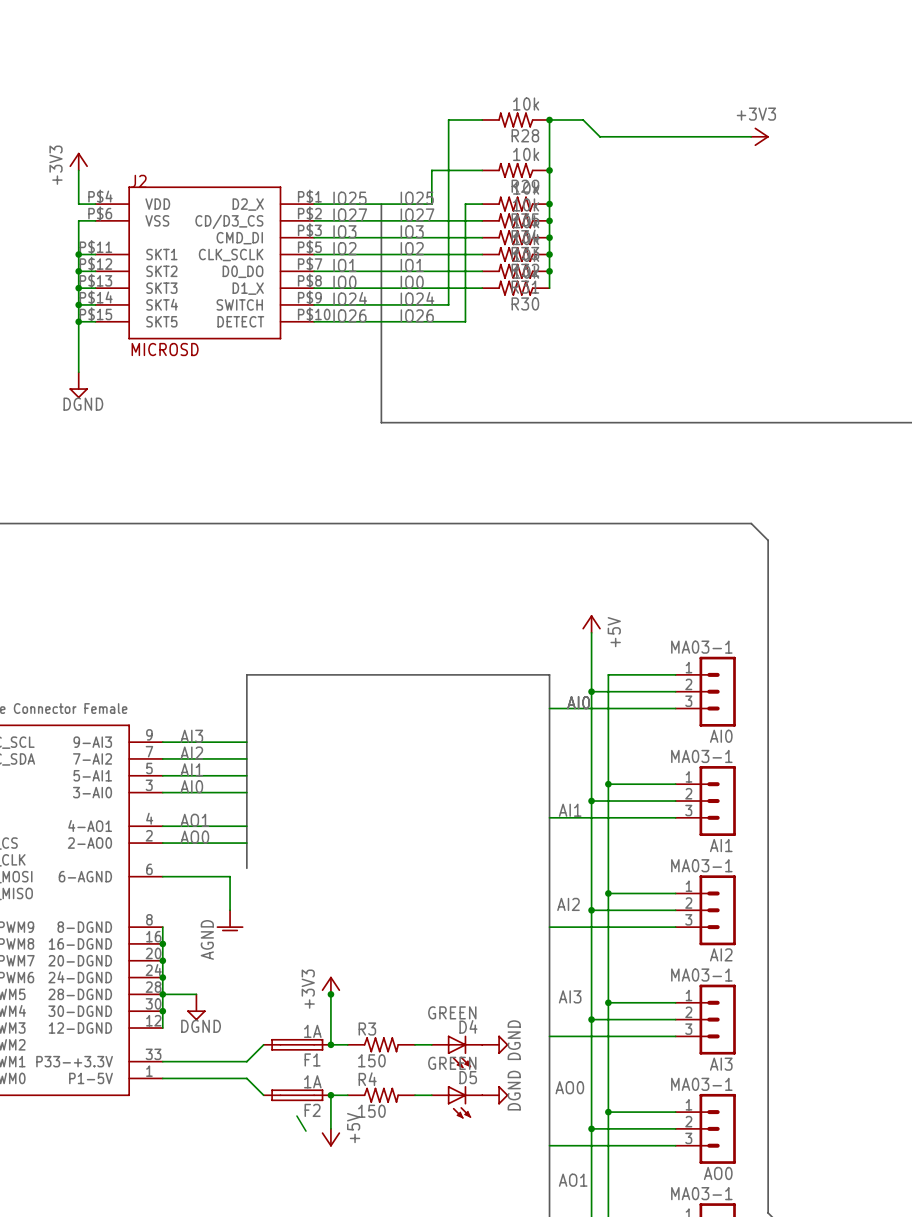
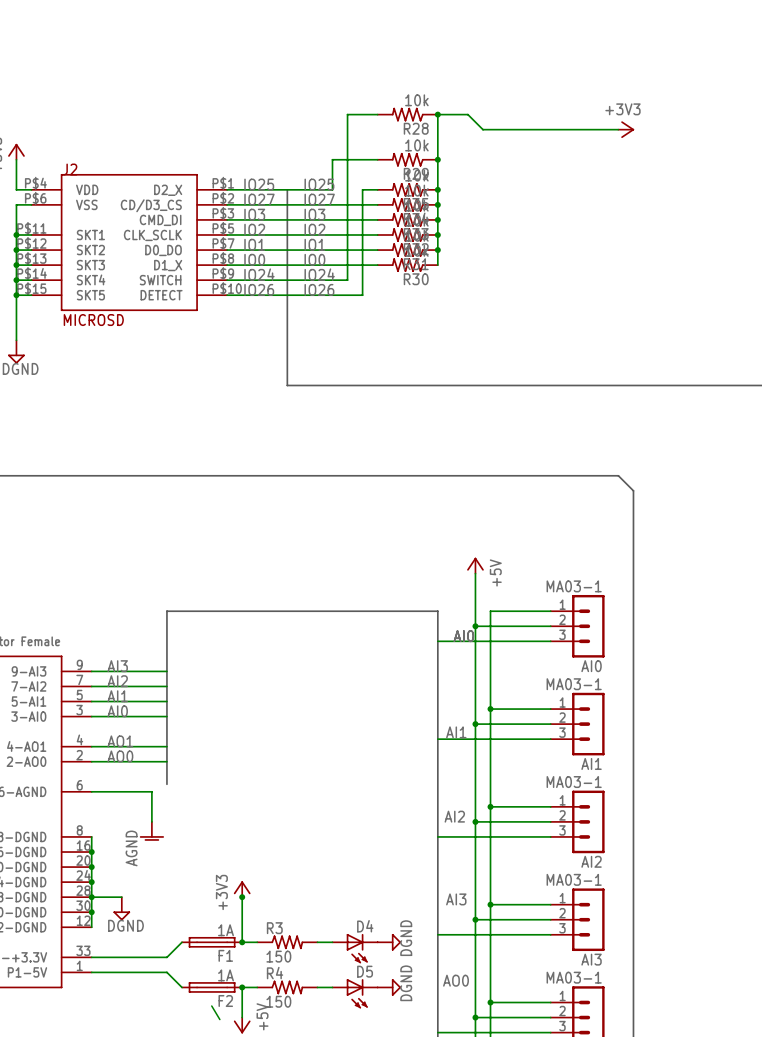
D4 value: GREEN (452, 1012) -> none
D5 value: GREEN (452, 1063) -> none

